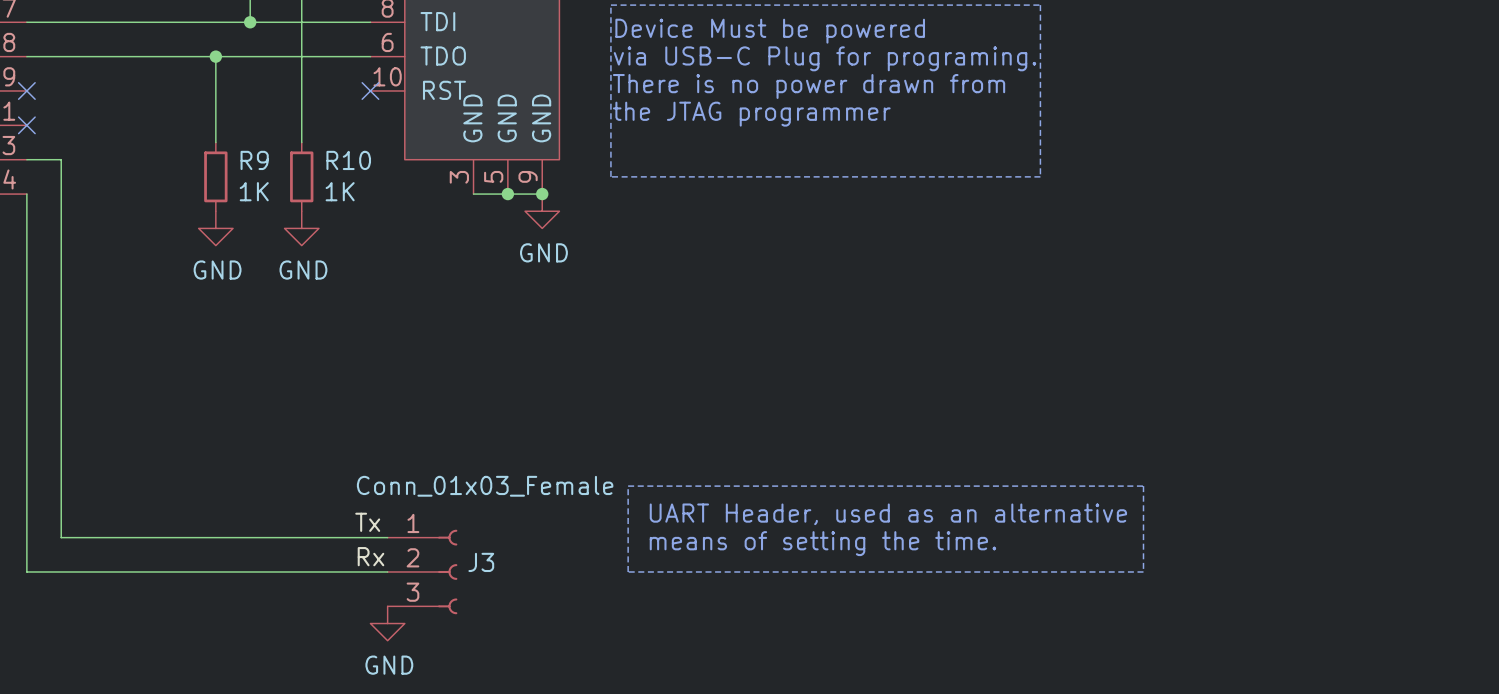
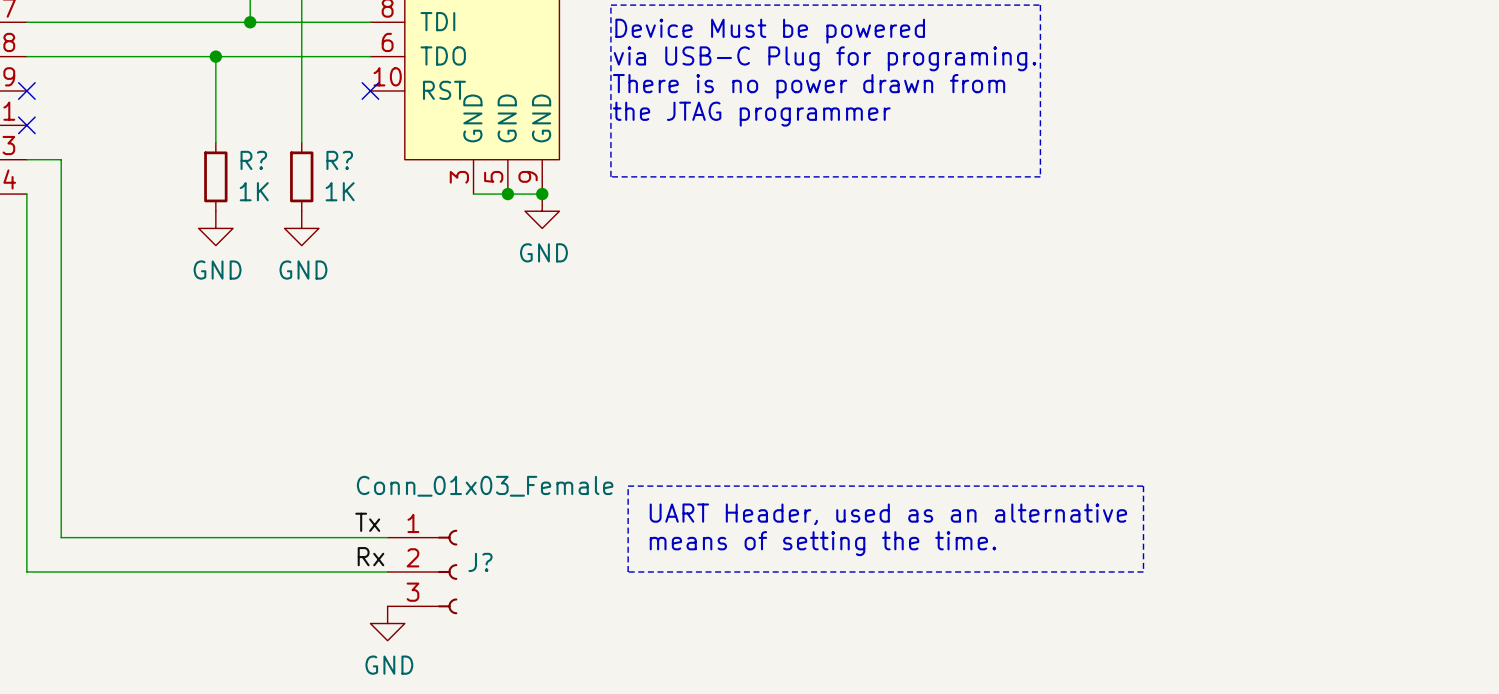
R9 name: R9 (254, 160) -> R? (253, 160)
R10 name: R10 (348, 160) -> R? (339, 160)
J3 name: J3 (481, 562) -> J? (480, 562)

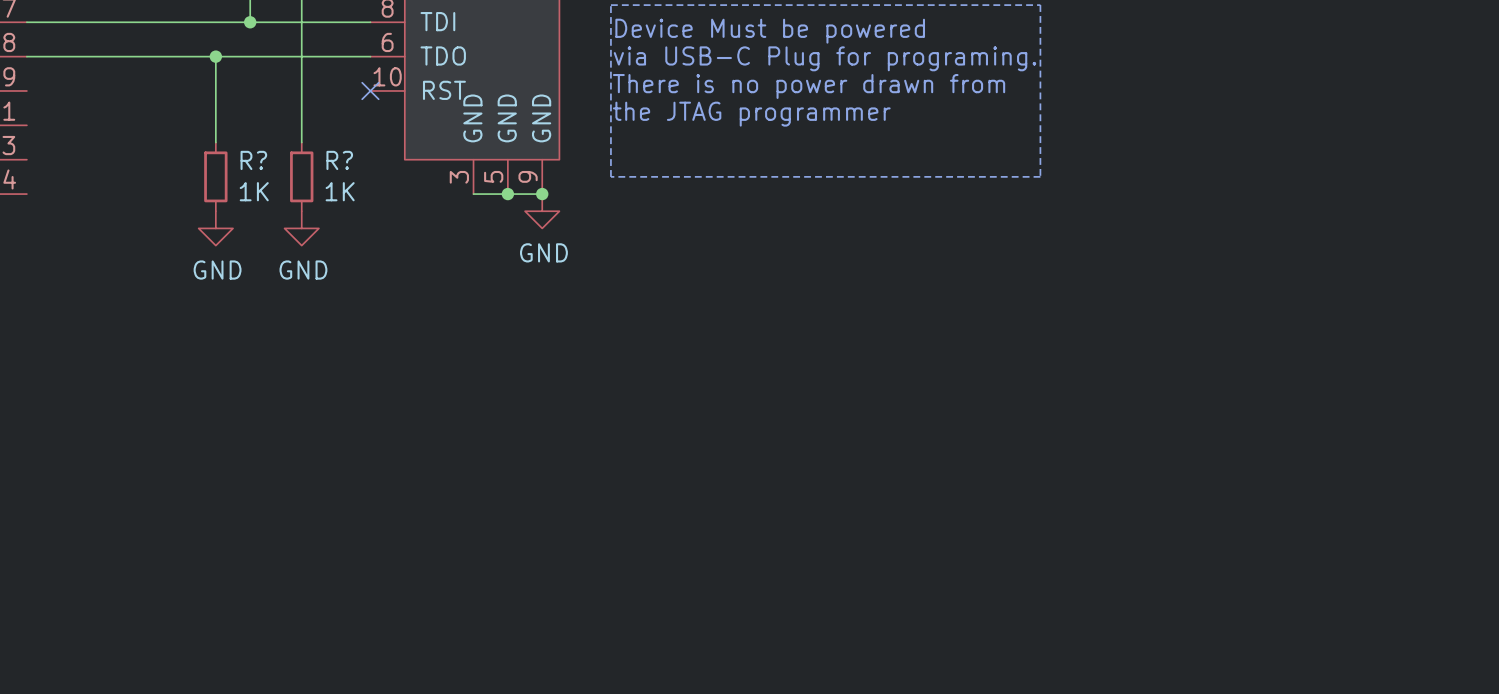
no-connect mark: (26, 90) -> none
no-connect mark: (26, 125) -> none
wire: (26, 159) (61, 159) (61, 537) (387, 537) -> none
wire: (26, 194) (26, 571) (387, 571) -> none
line: (628, 486) (628, 571) (1143, 571) (1143, 486) (628, 486) -> none
text: UART Header, used as an alternative (888, 514) -> none
label: Tx (367, 522) -> none
text: means of setting the time. (822, 543) -> none
label: Rx (370, 556) -> none
J?: Conn_01x03_Female (422, 571) -> none
power symbol: GND (387, 623) -> none

